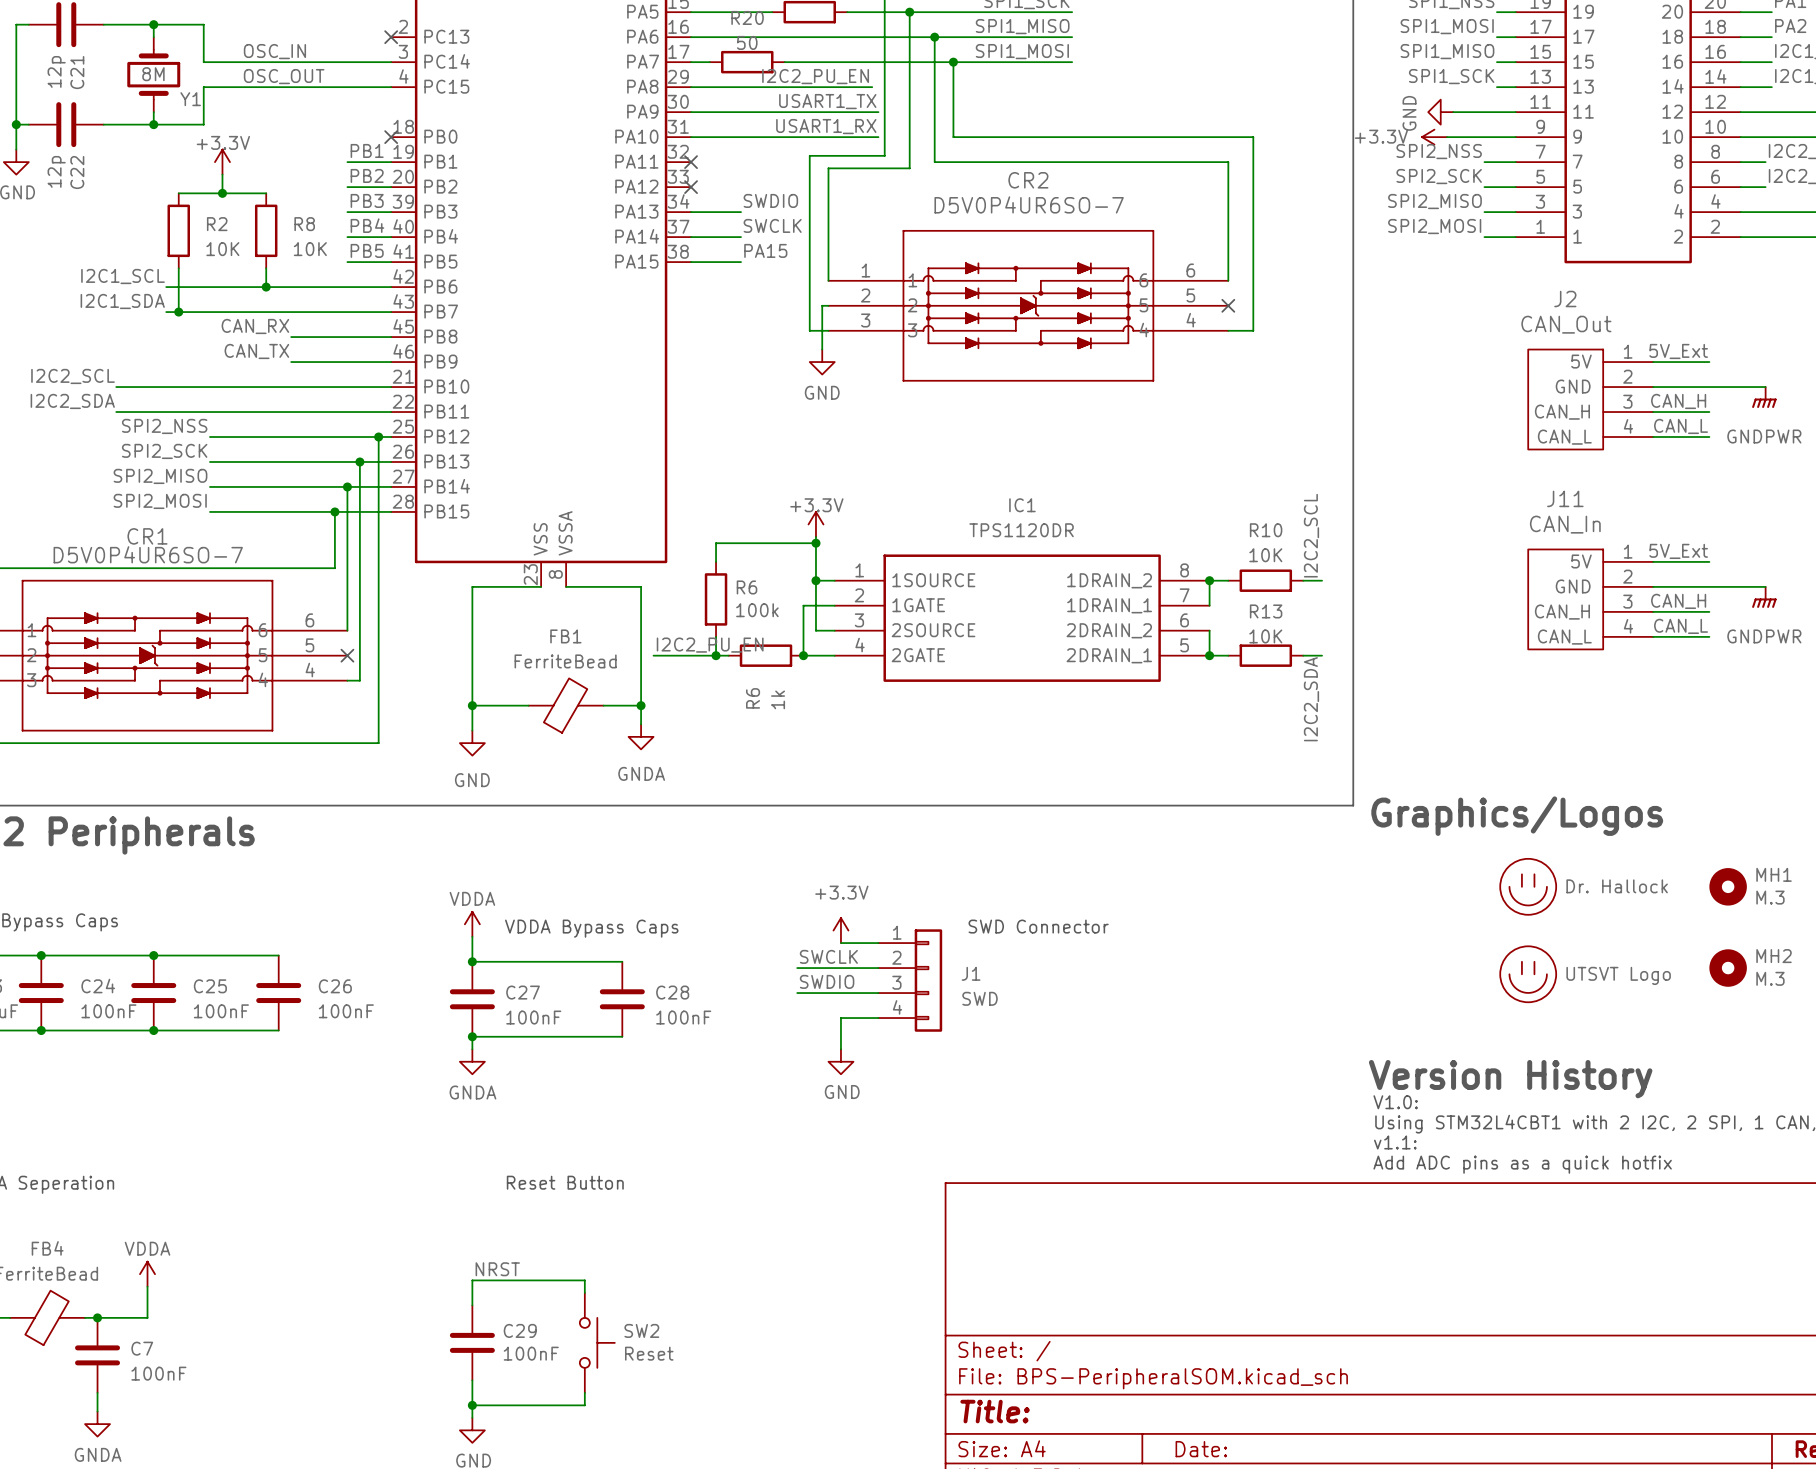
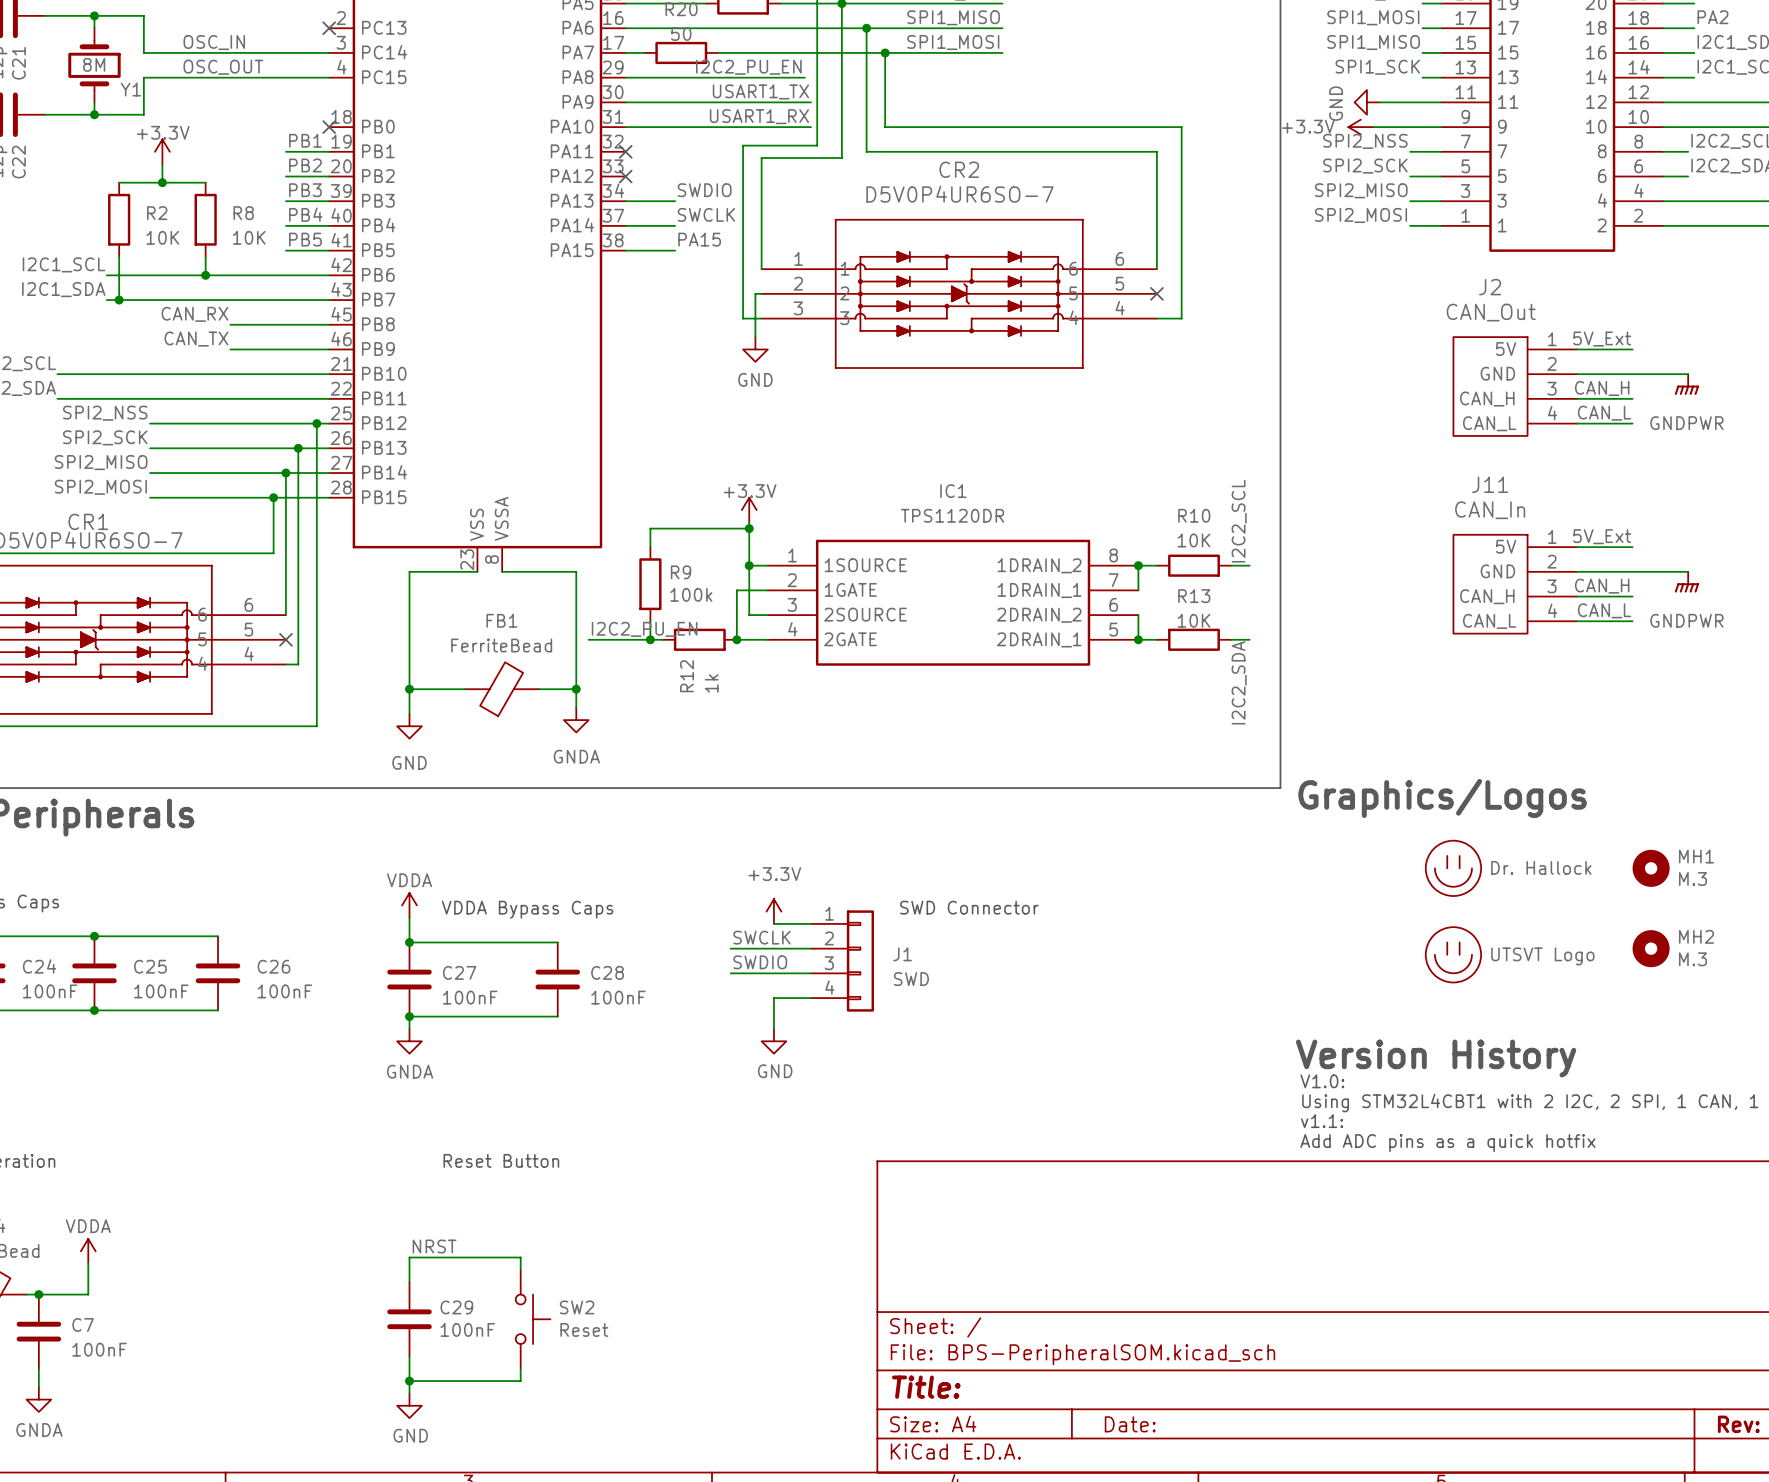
R6 name: R6 (747, 587) -> R9 (681, 572)
R6 name: R6 (753, 698) -> R12 (687, 676)

